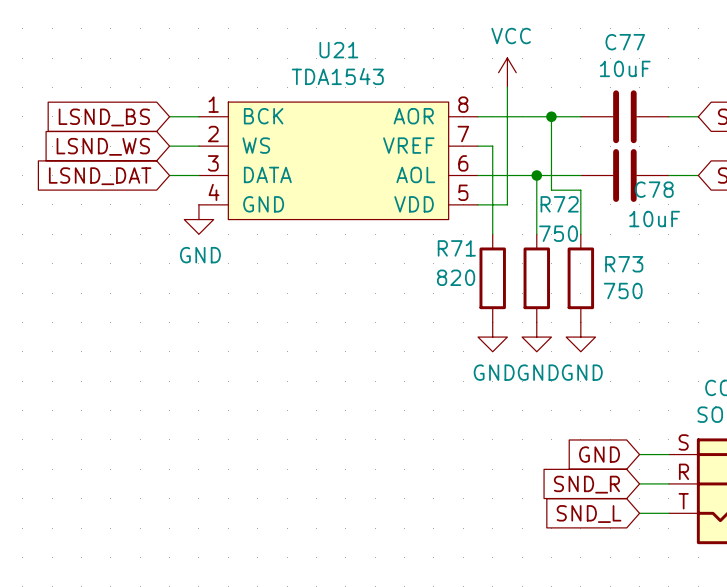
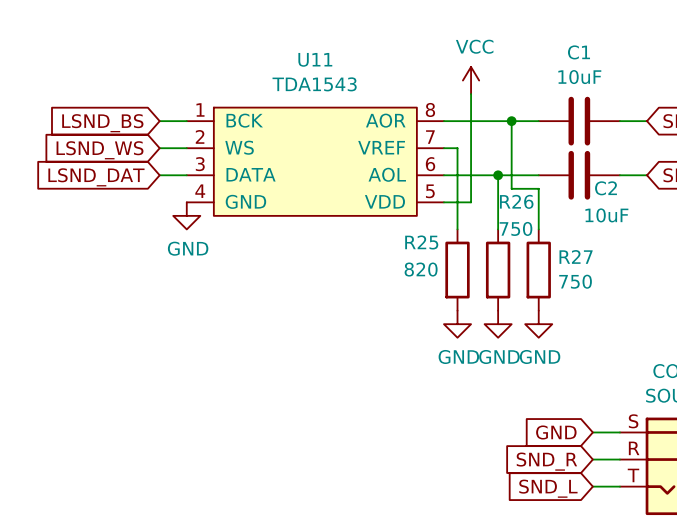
C77 name: C77 (625, 42) -> C1 (579, 52)
U21 name: U21 (338, 50) -> U11 (315, 59)
C78 name: C78 (654, 189) -> C2 (606, 188)
R72 name: R72 (559, 204) -> R26 (516, 201)
R71 name: R71 (456, 248) -> R25 (421, 242)
R73 name: R73 (624, 264) -> R27 (576, 256)

